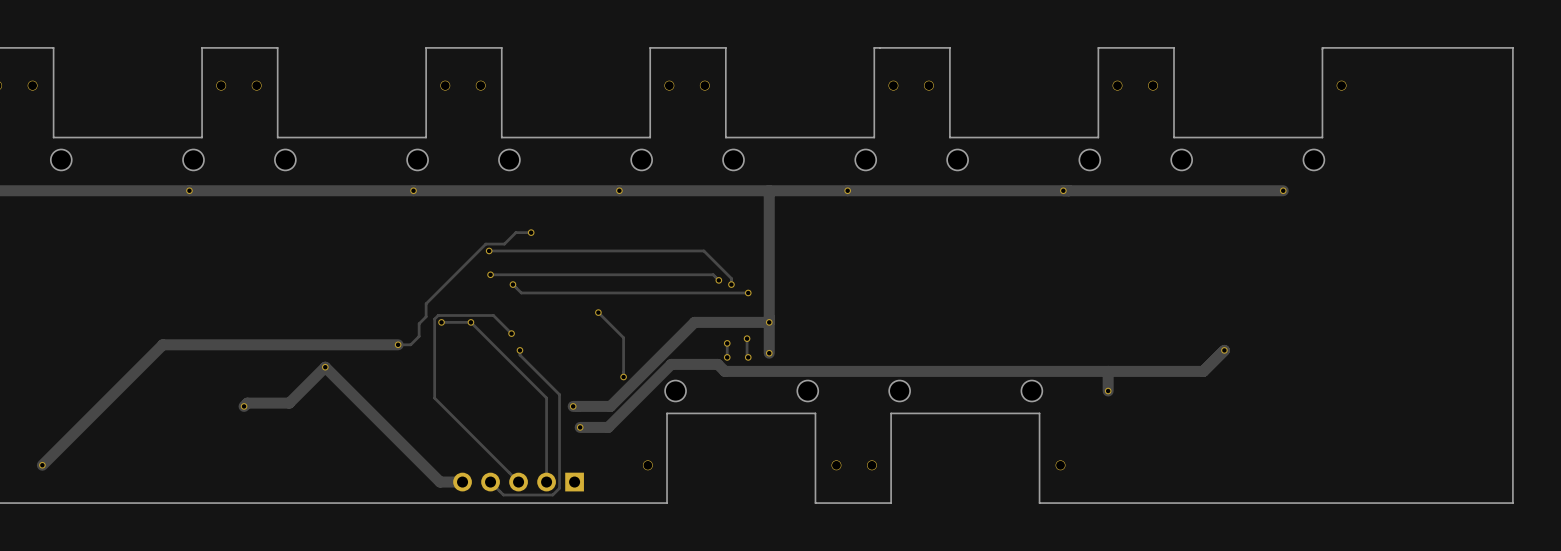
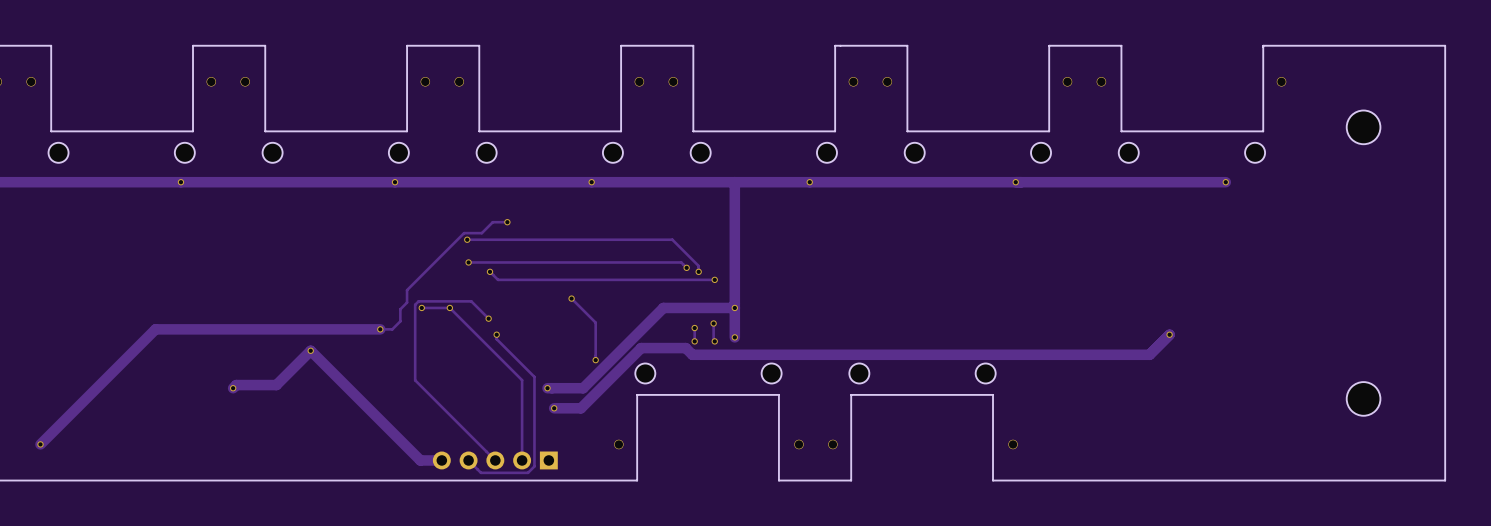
part: none -> (1363, 127)
track: (1108, 371) (1108, 391) -> none
via: (1108, 391) -> none
part: none -> (1363, 398)

